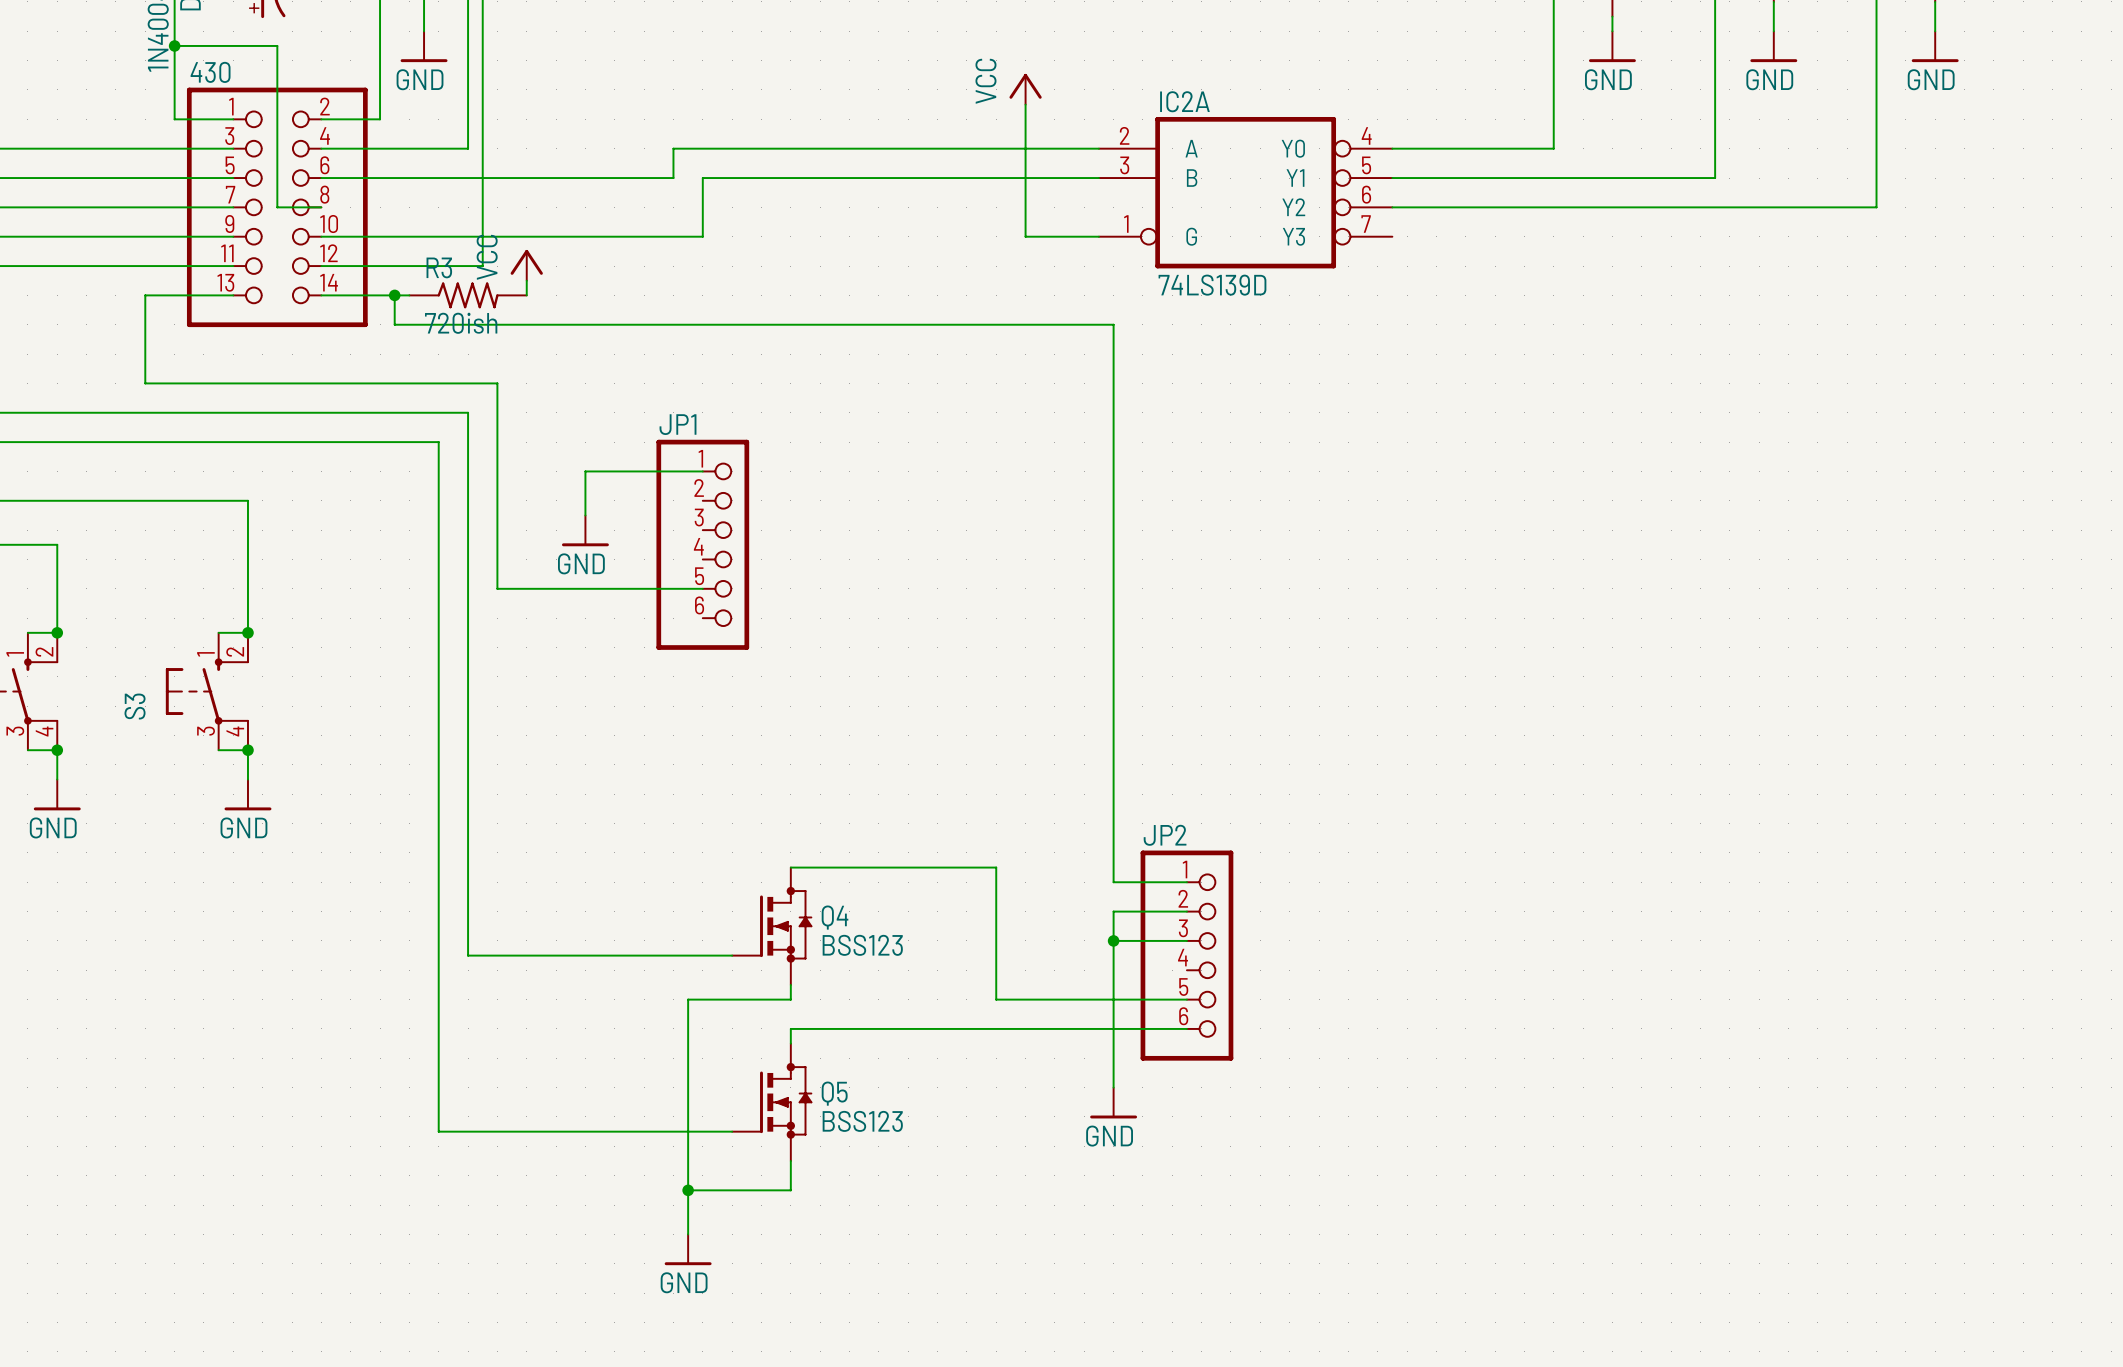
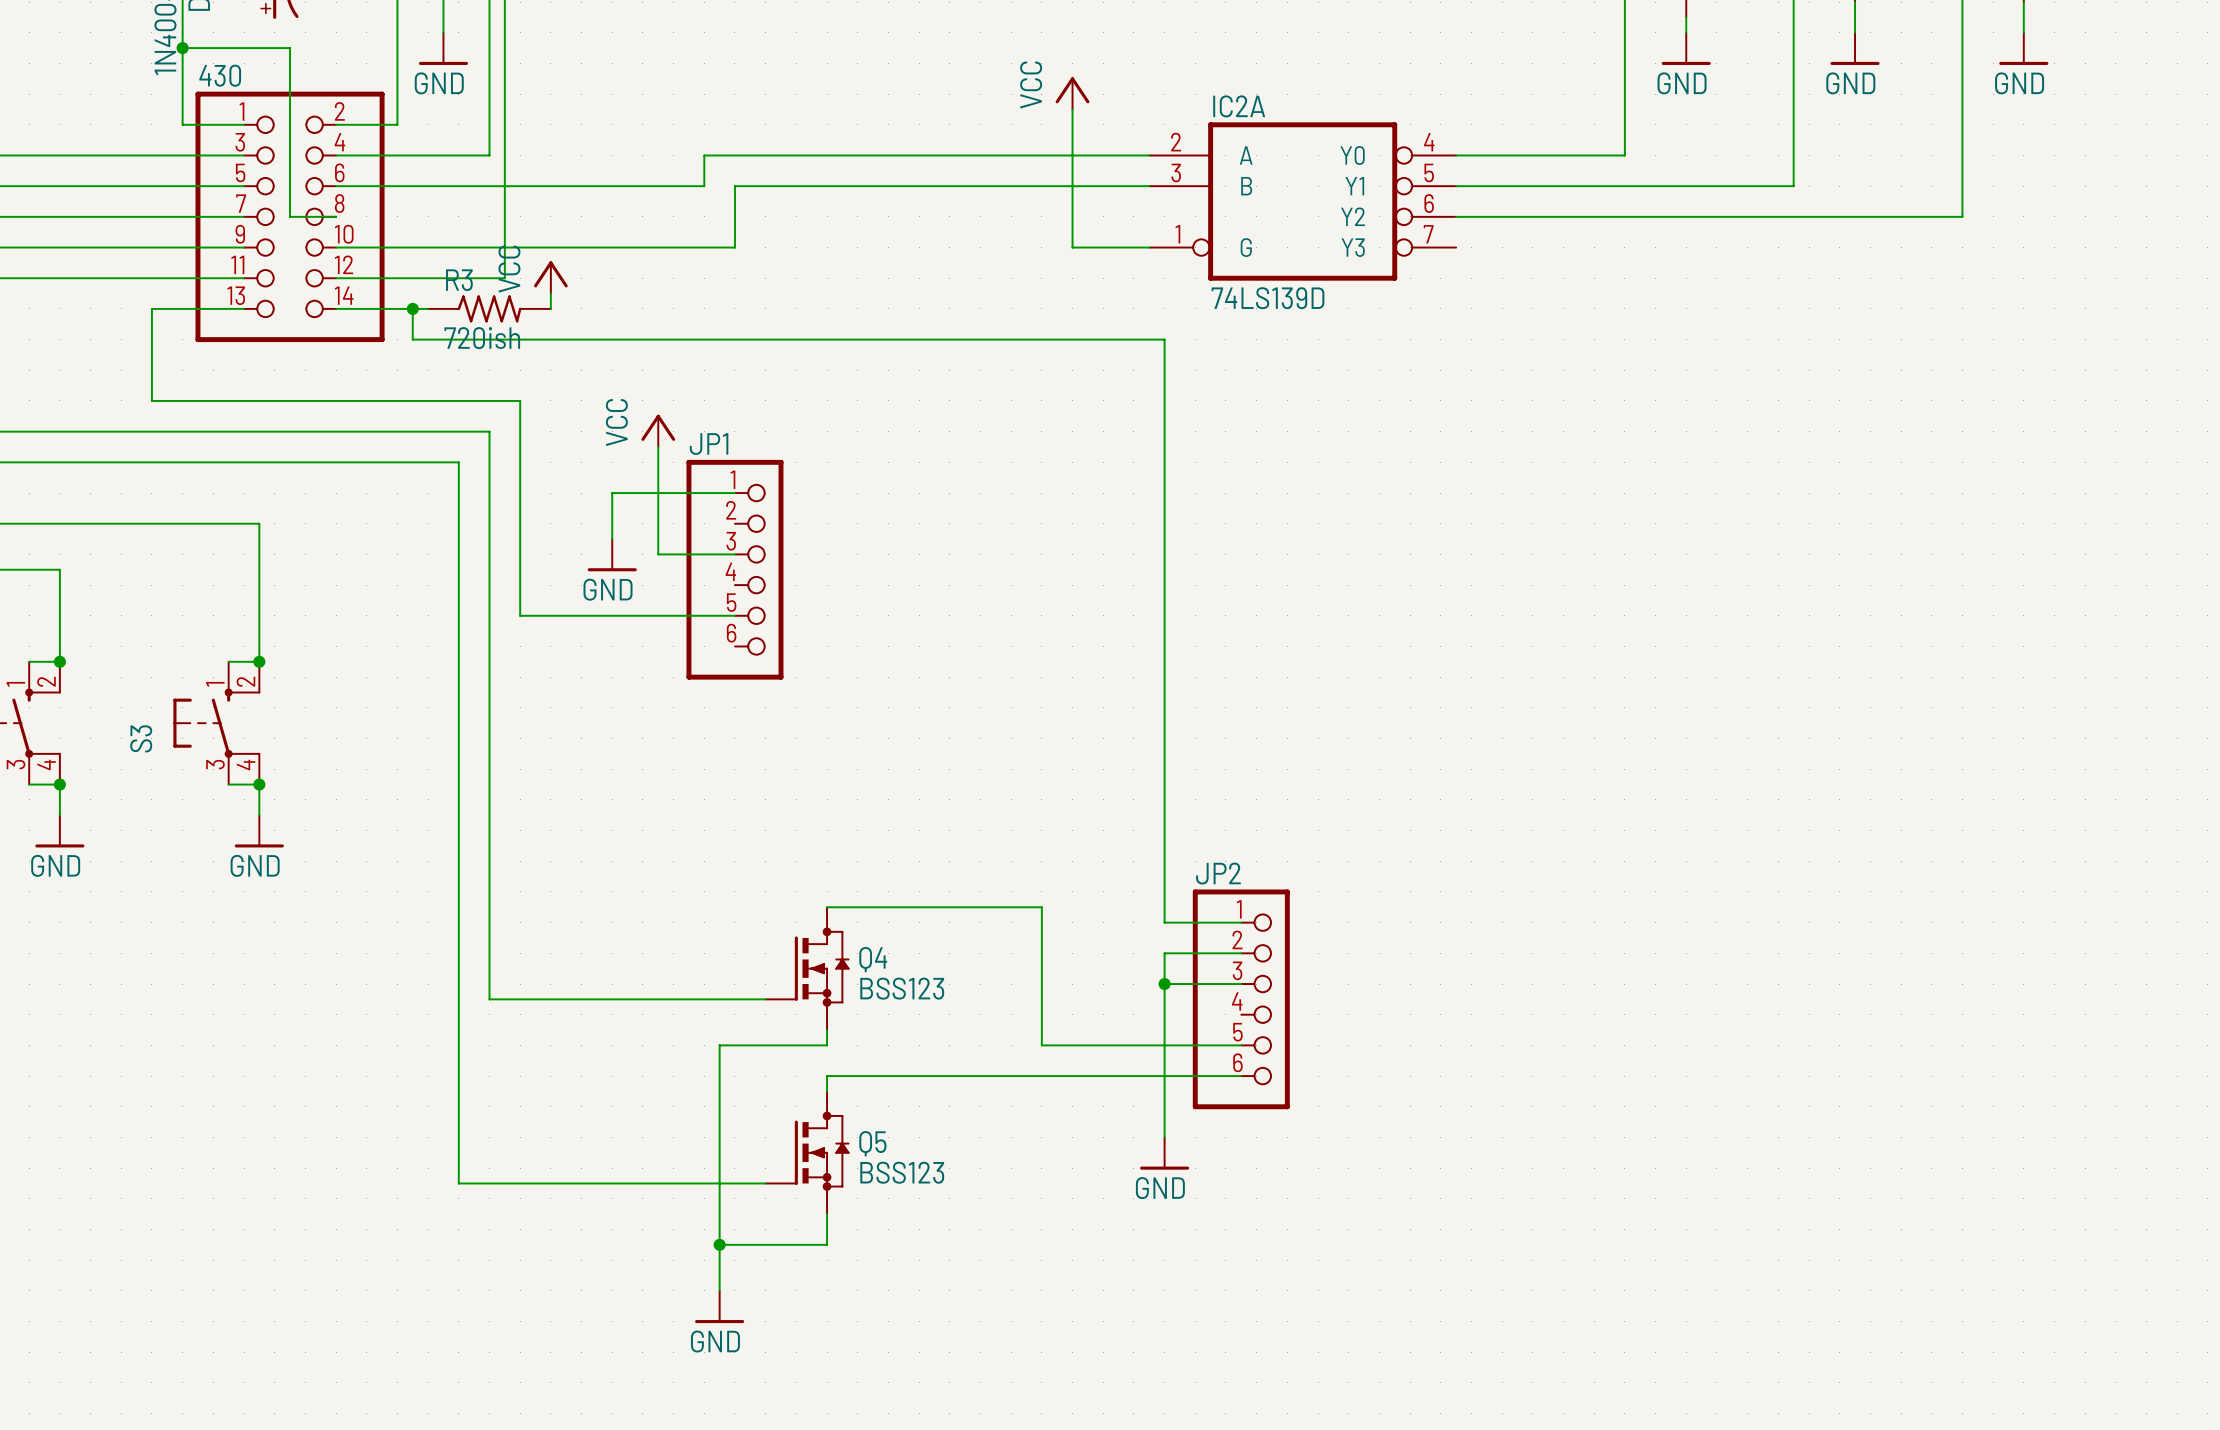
power symbol: none -> VCC (658, 430)
wire: none -> (658, 447) (658, 554) (734, 554)

